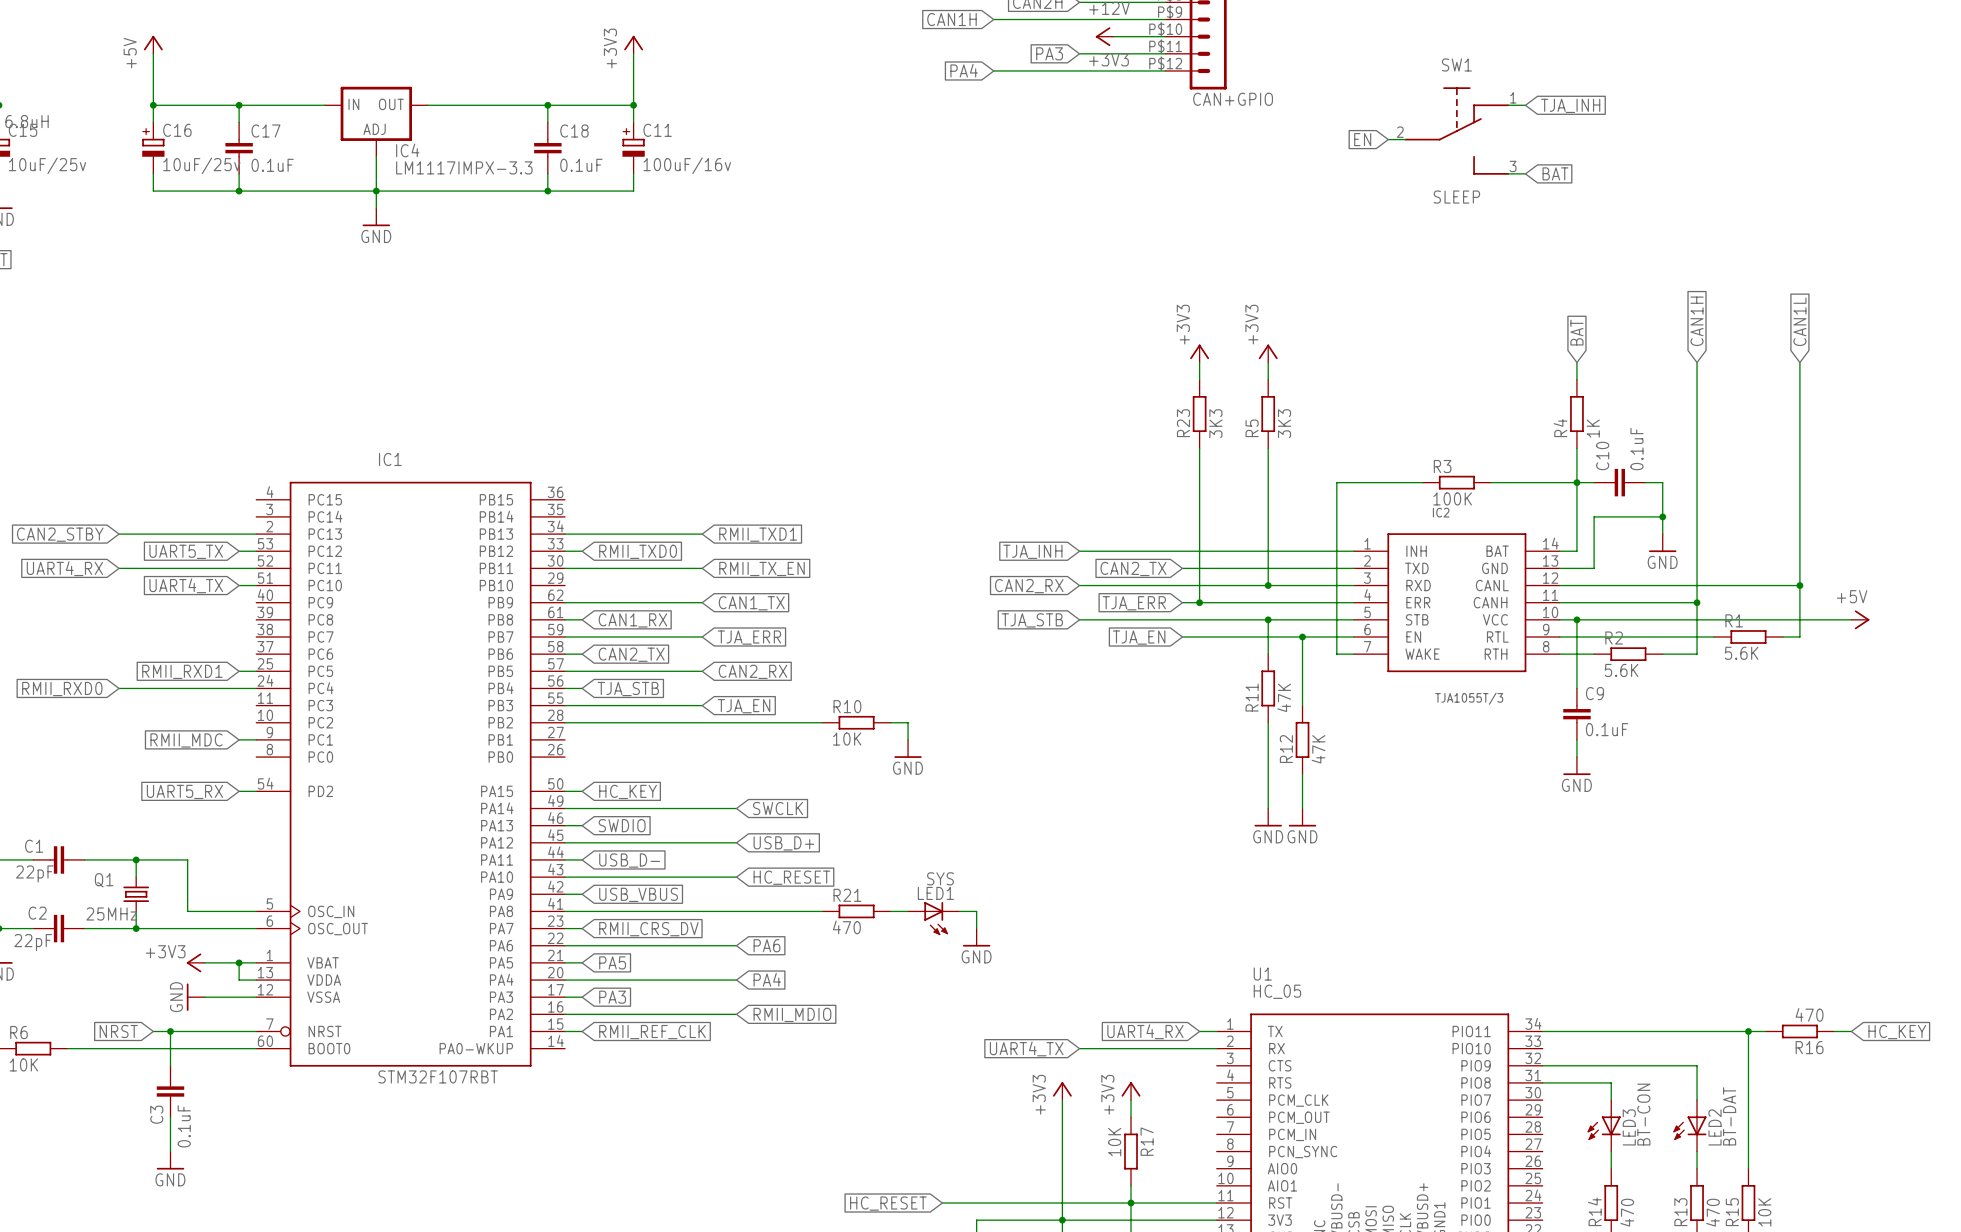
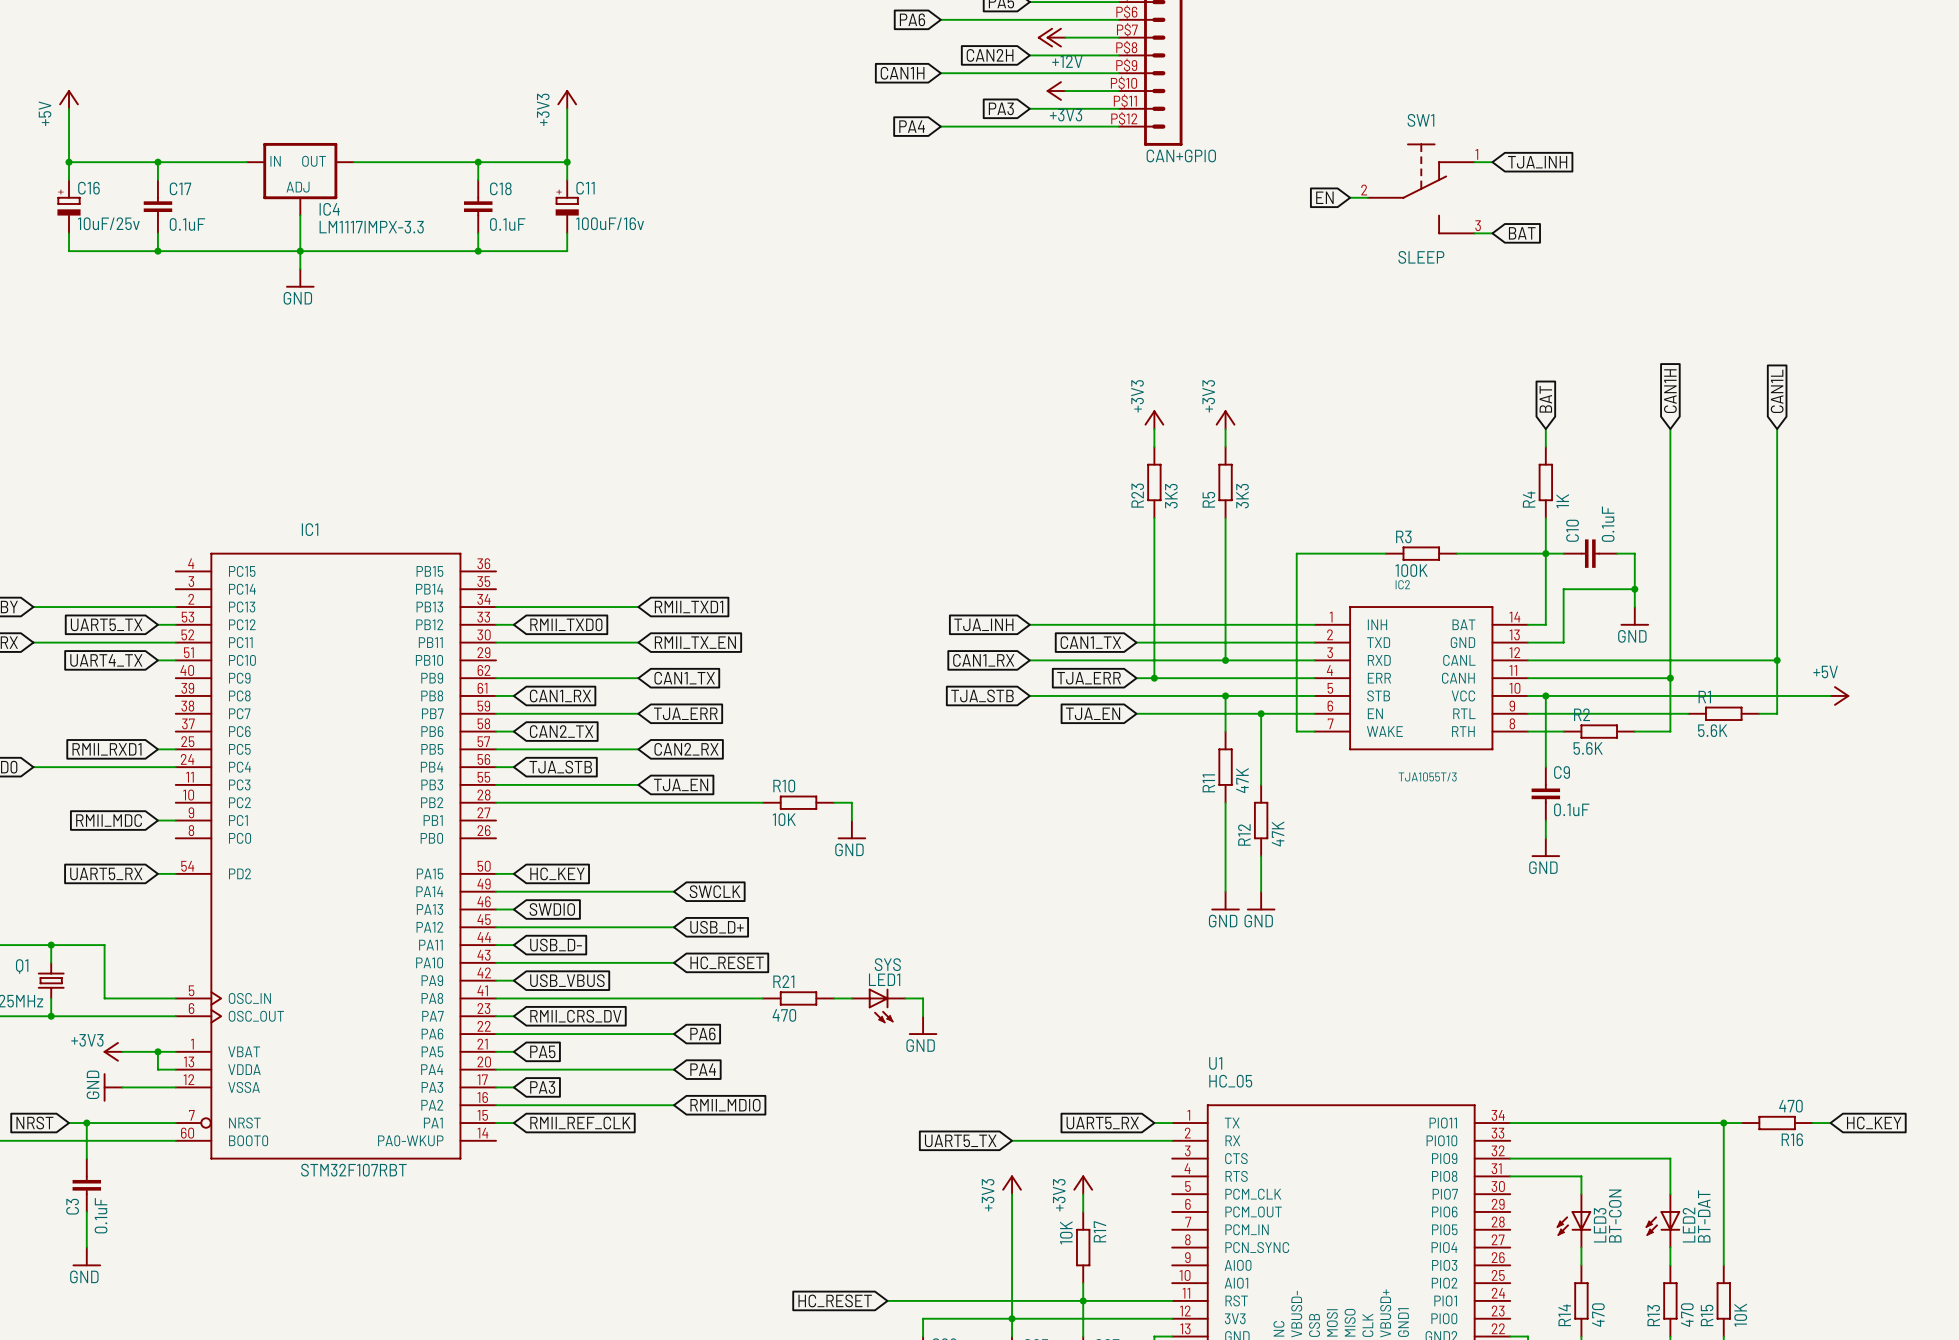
global label: CAN2_TX (1133, 568) -> CAN1_TX (1090, 642)
global label: CAN2_RX (1029, 586) -> CAN1_RX (983, 660)
global label: UART4_RX (1145, 1031) -> UART5_RX (1102, 1123)
global label: UART4_TX (1026, 1048) -> UART5_TX (960, 1140)
wire: none -> (1012, 1140) (1029, 1140)

